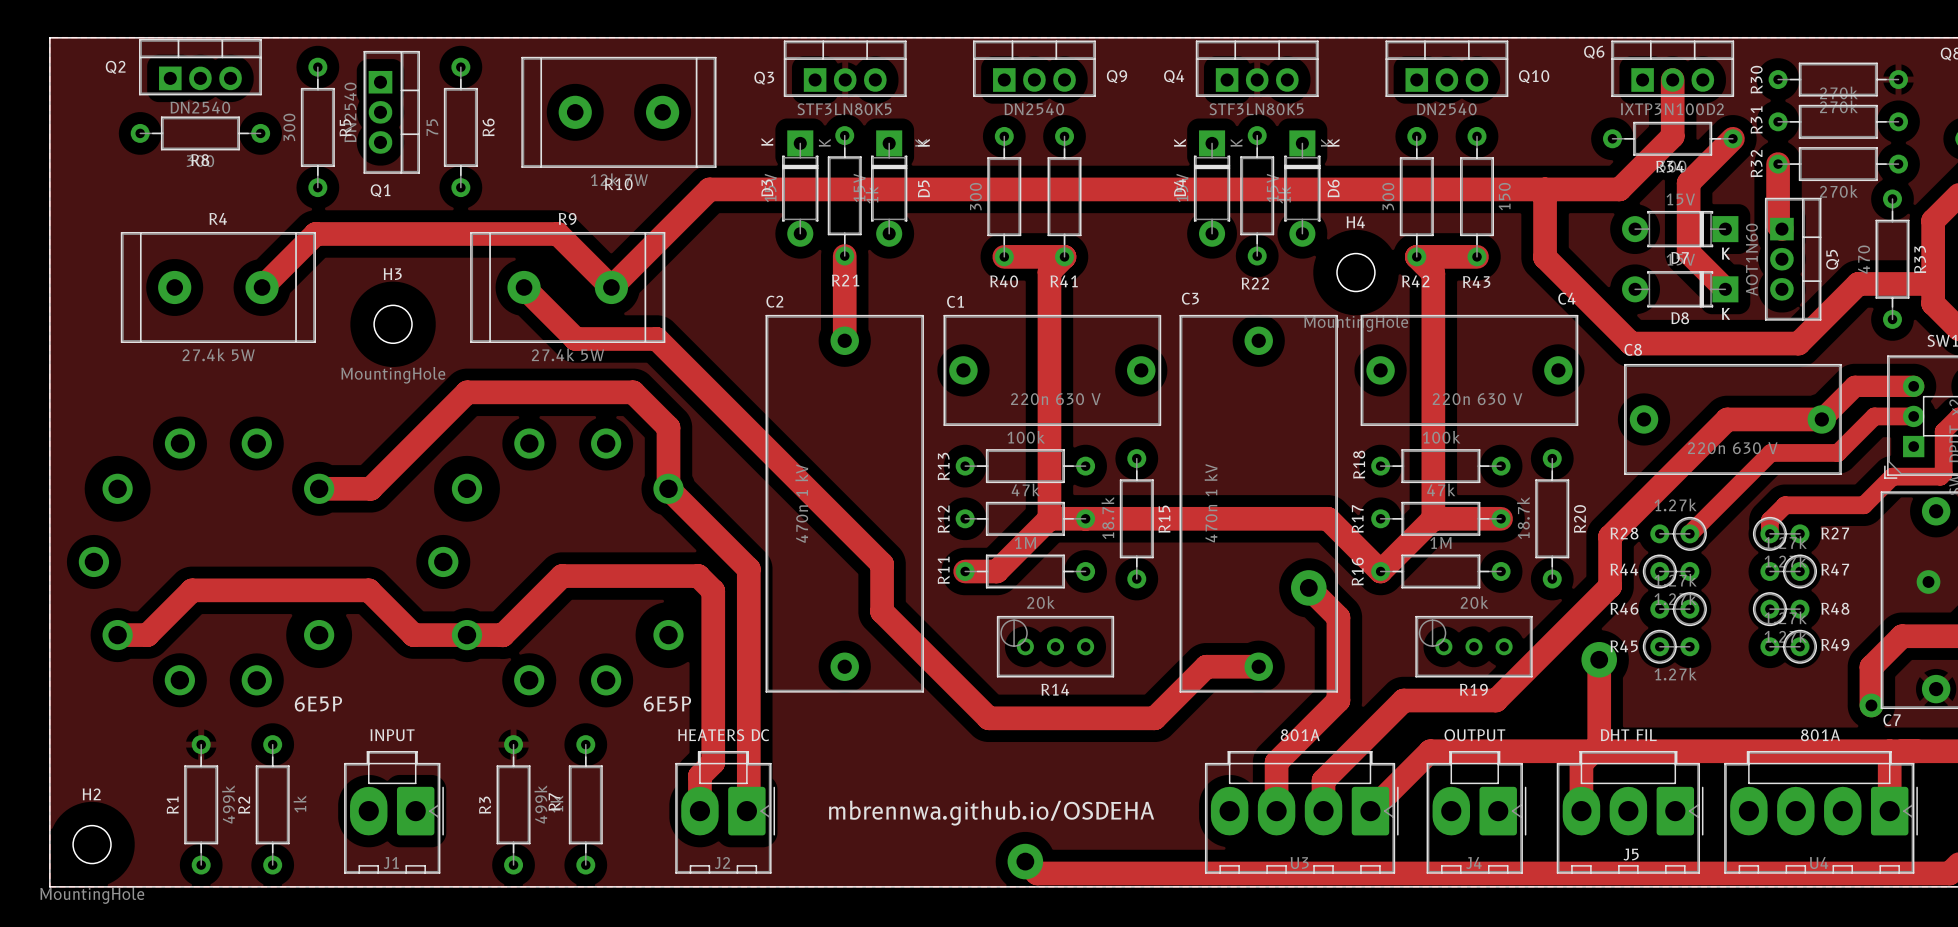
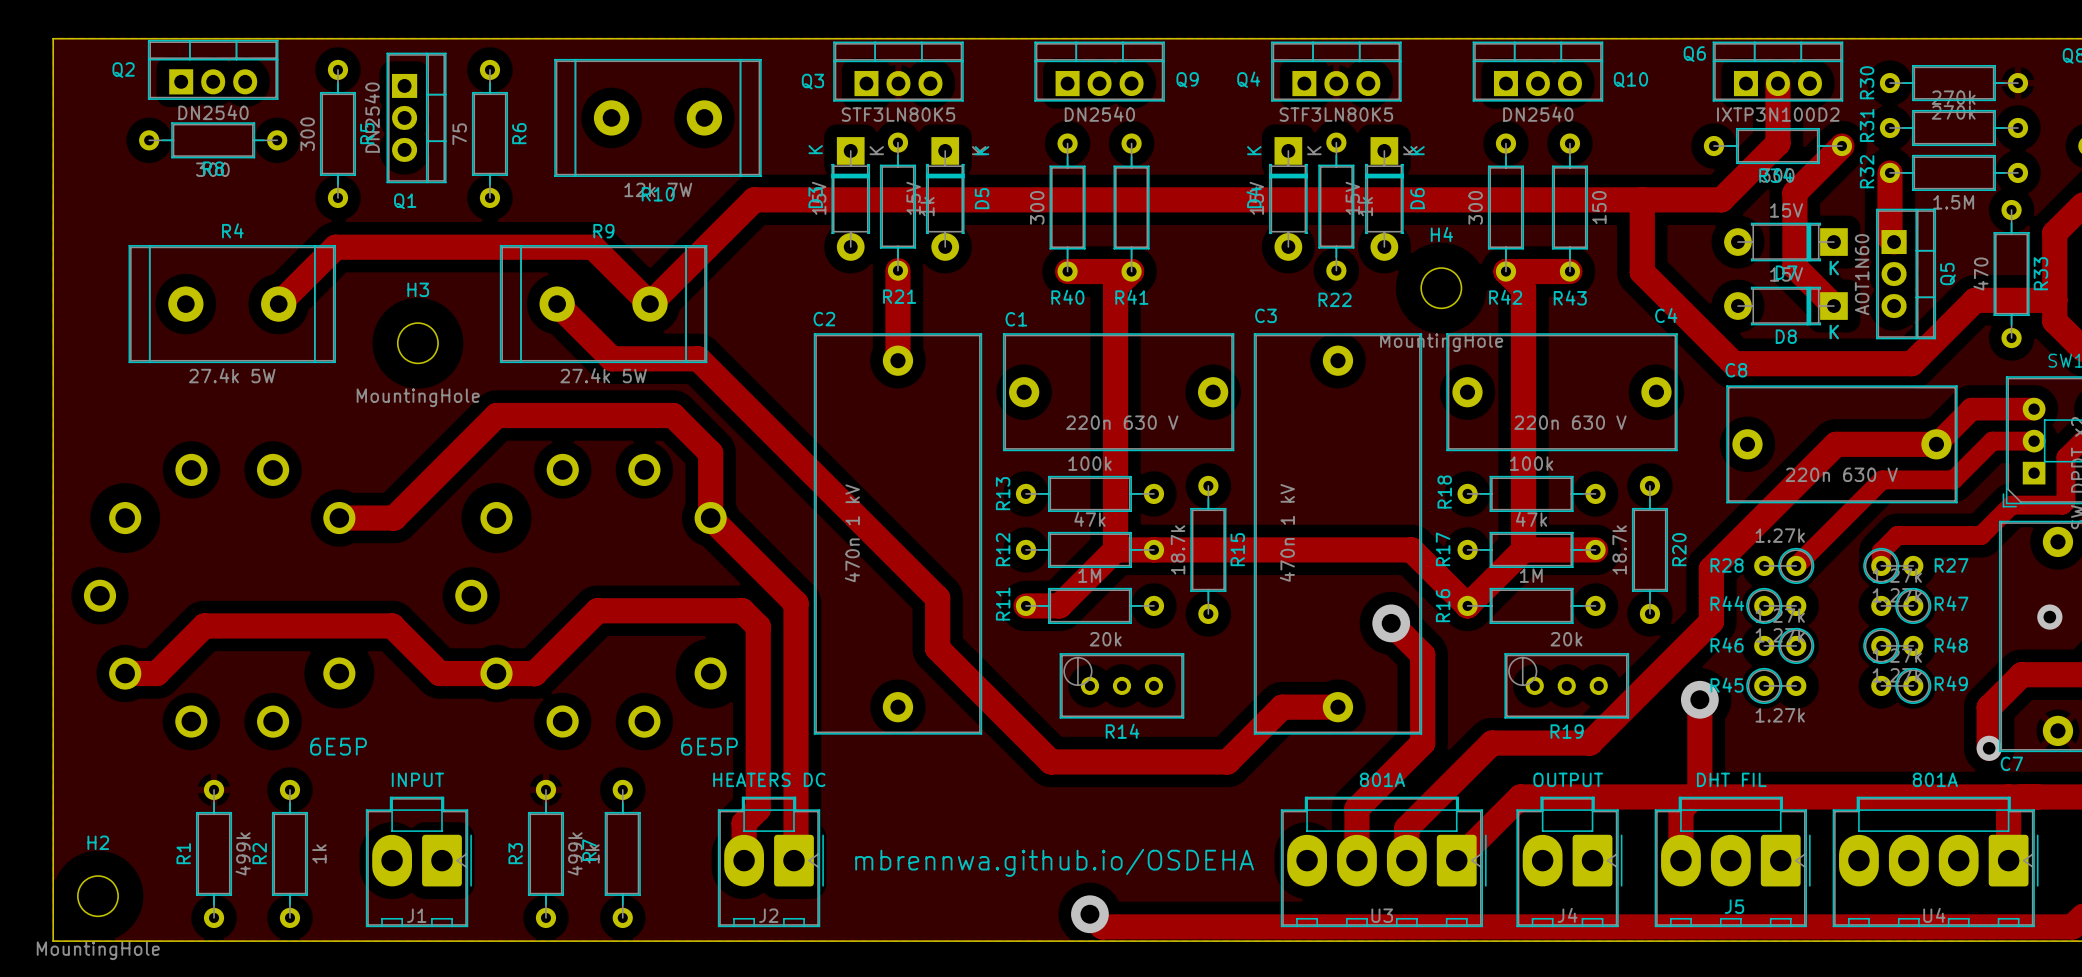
R32 value: 270k (1838, 191) -> 1.5M (1953, 202)

